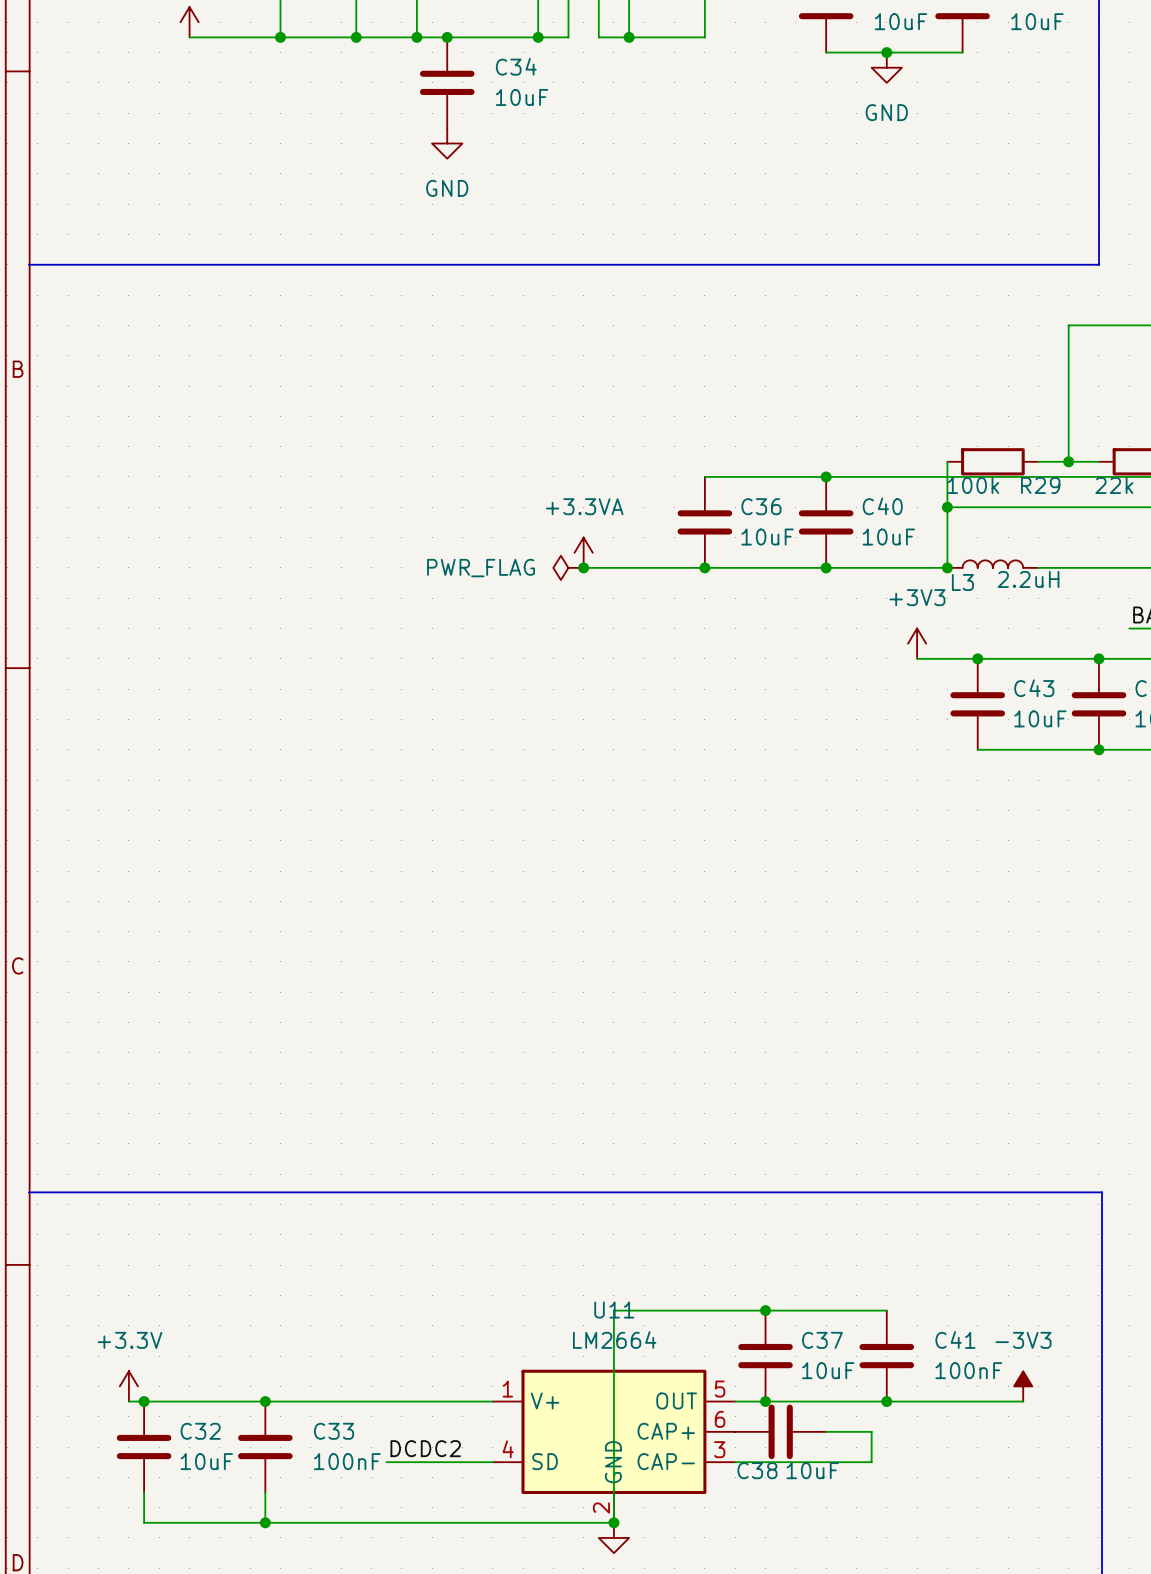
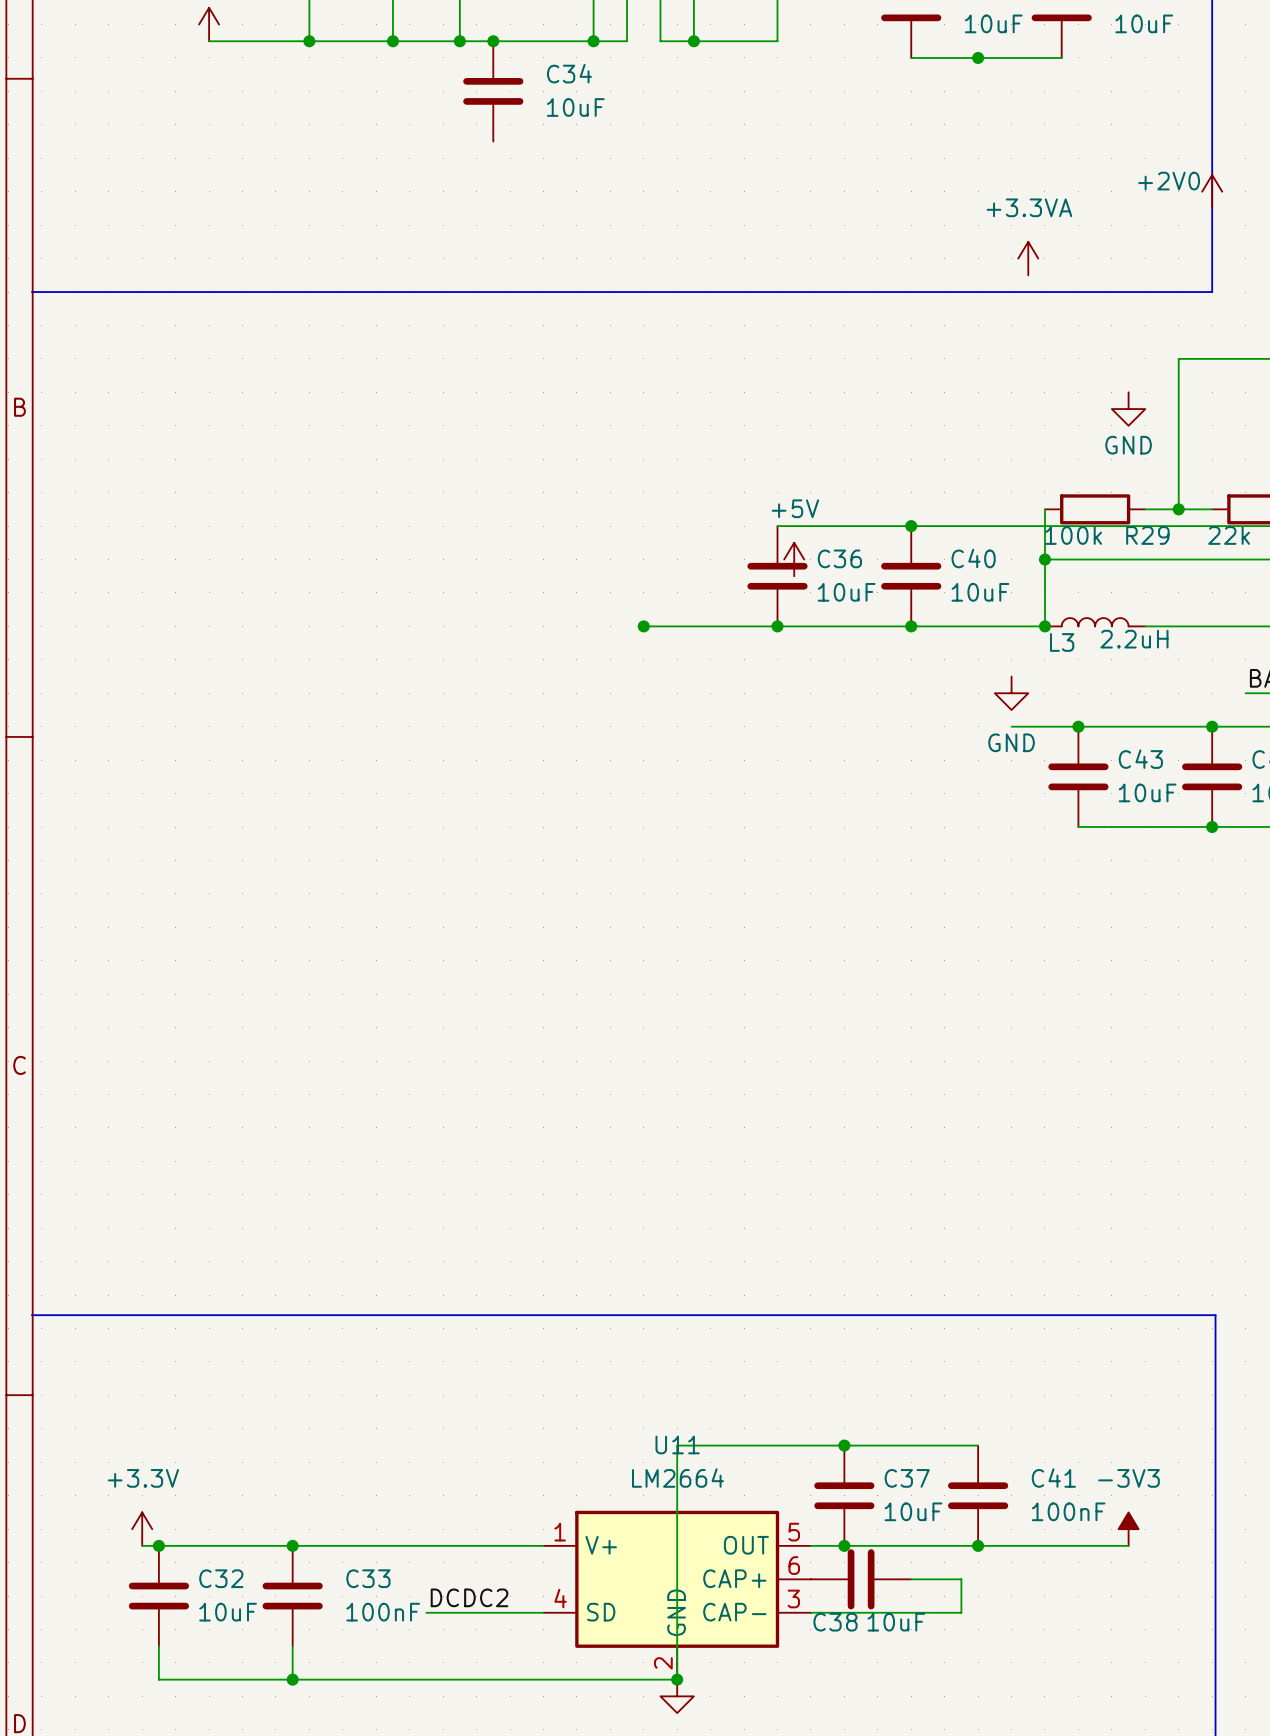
power symbol: GND (886, 67) -> none
power symbol: GND (447, 143) -> none
power symbol: none -> +2V0 (1212, 191)
power symbol: none -> +3.3VA (1028, 258)
power symbol: none -> GND (1128, 409)
power symbol: none -> +5V (794, 559)
power symbol: +3.3VA (583, 552) -> none
power symbol: PWR_FLAG (568, 567) -> none
power symbol: none -> GND (1011, 693)
power symbol: +3V3 (917, 643) -> none

